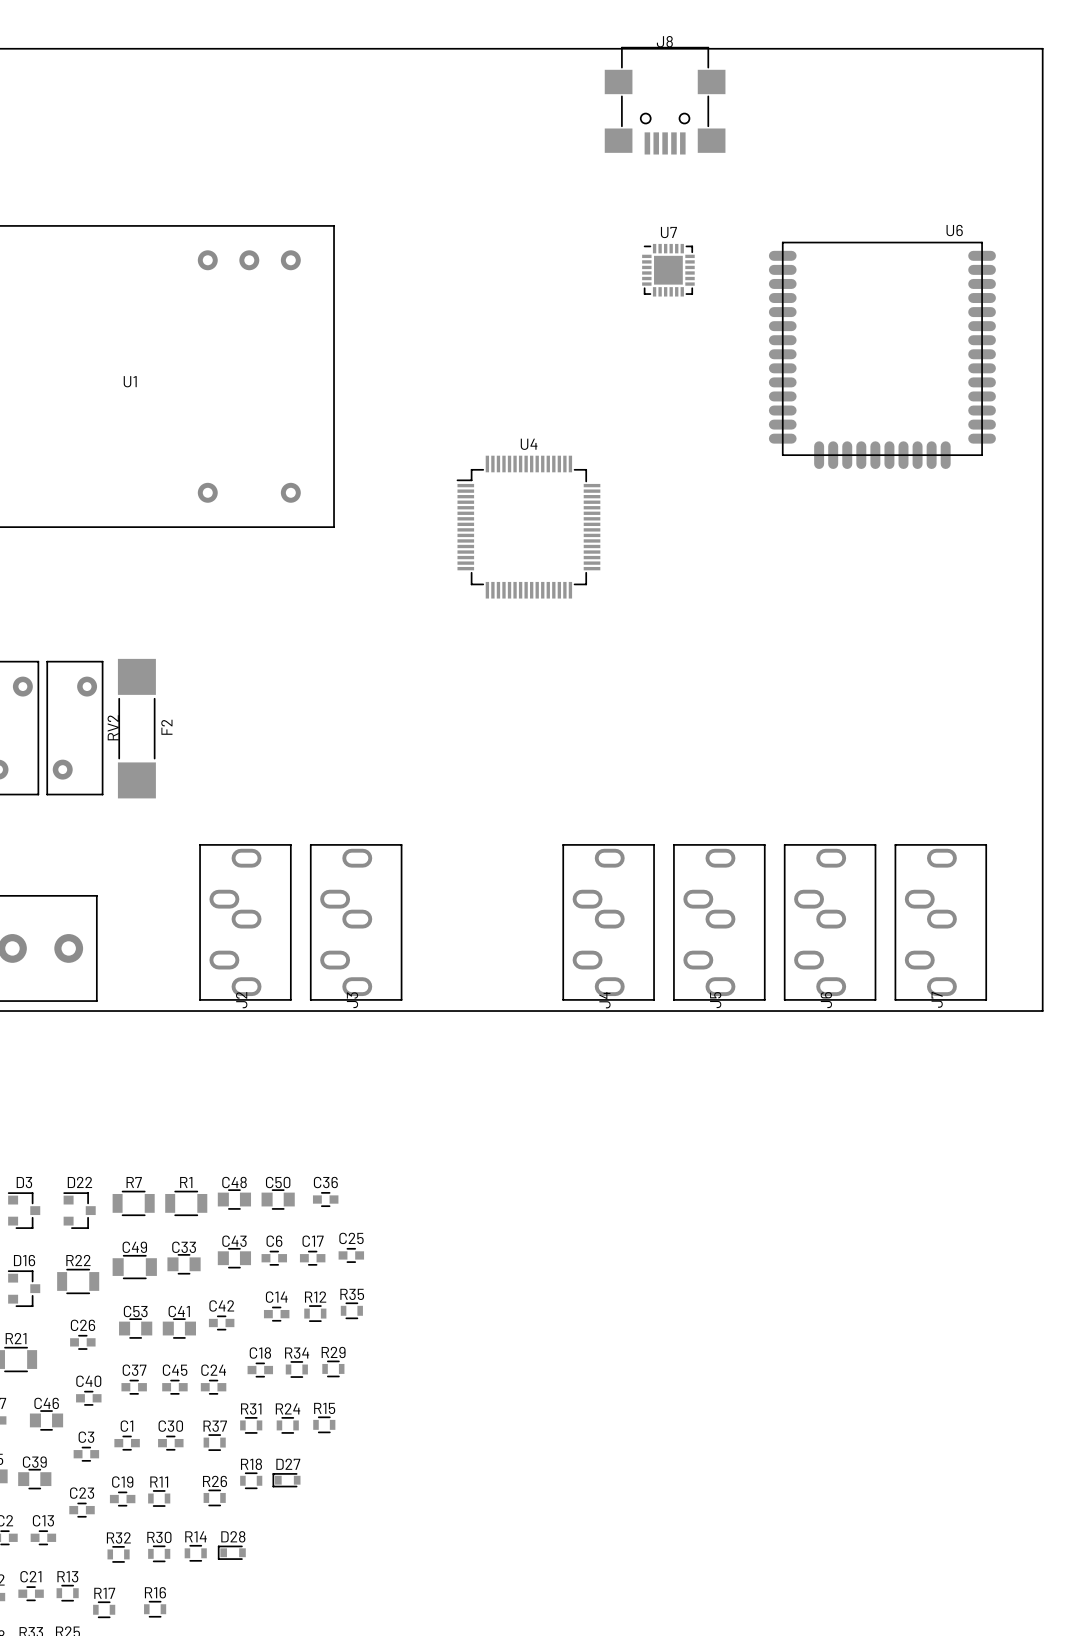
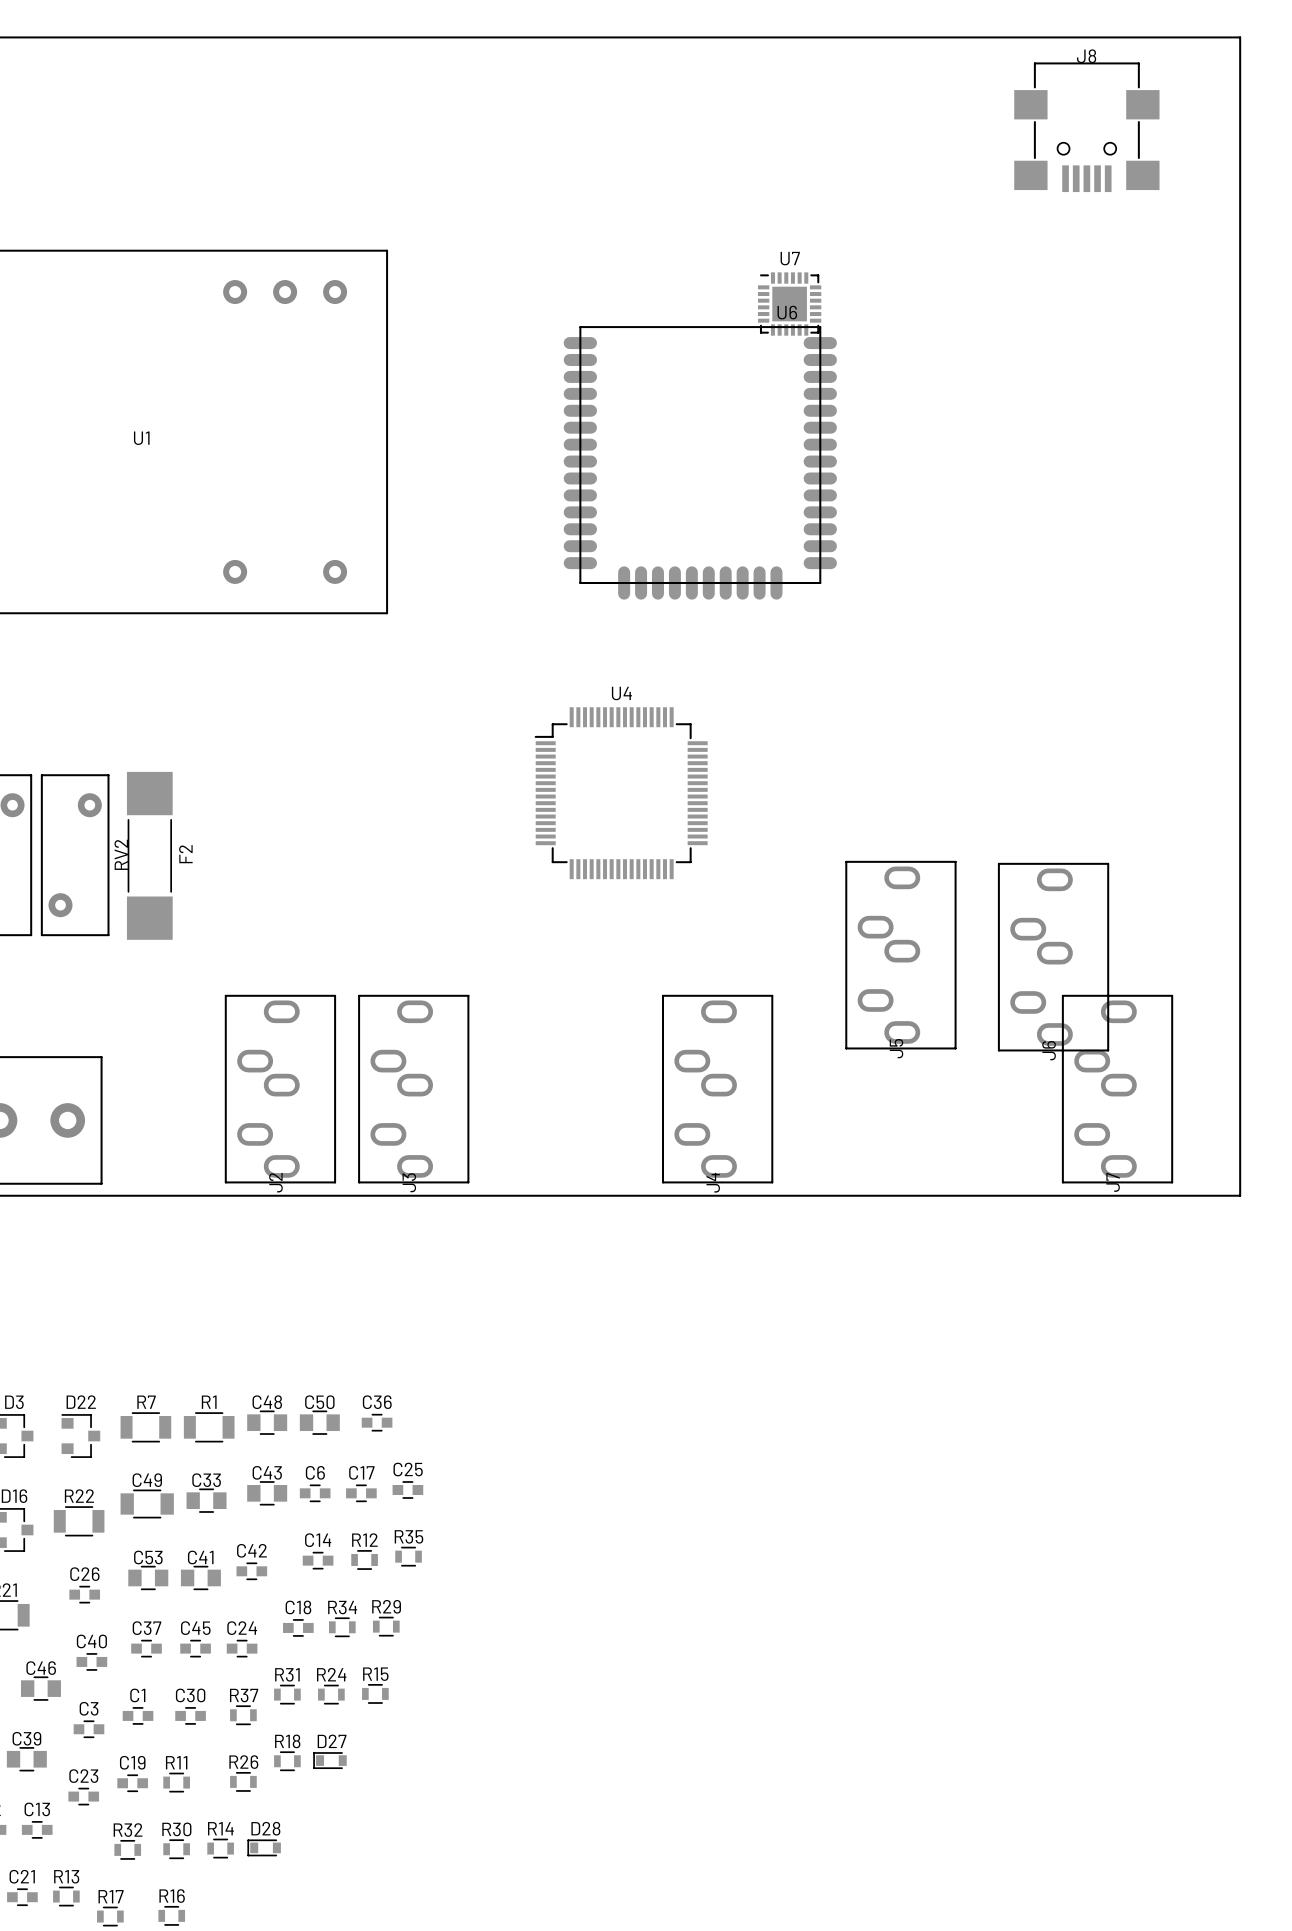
J8 position: (665, 100) -> (1086, 127)
U6 position: (882, 355) -> (700, 462)
U4 position: (528, 527) -> (621, 793)
J5 position: (719, 922) -> (900, 955)
J6 position: (830, 922) -> (1053, 957)

